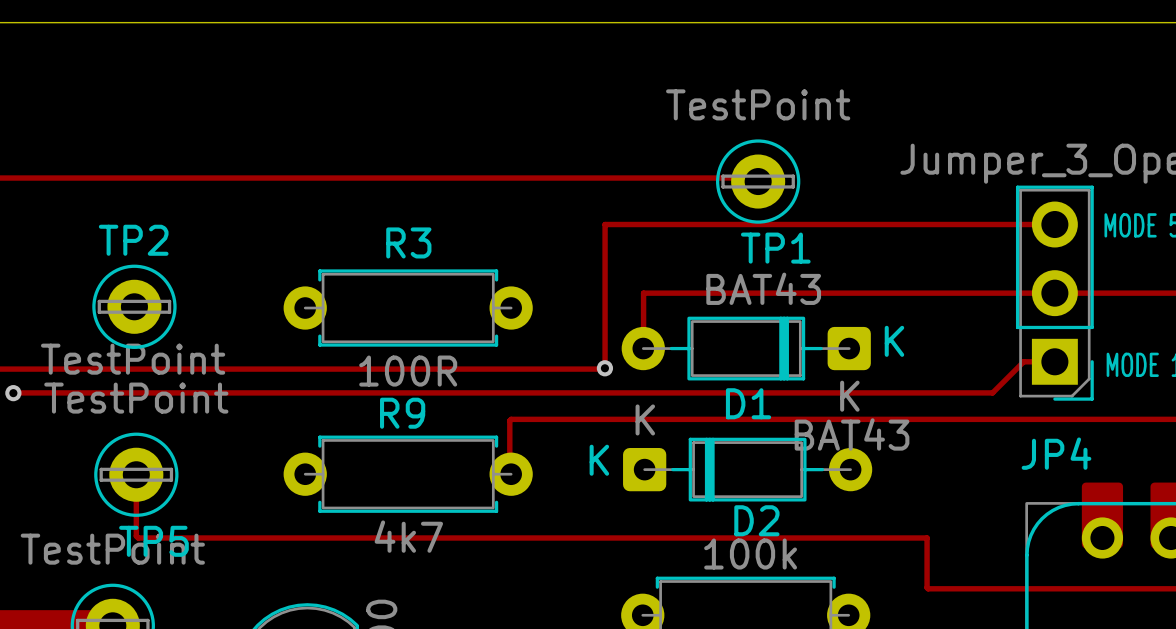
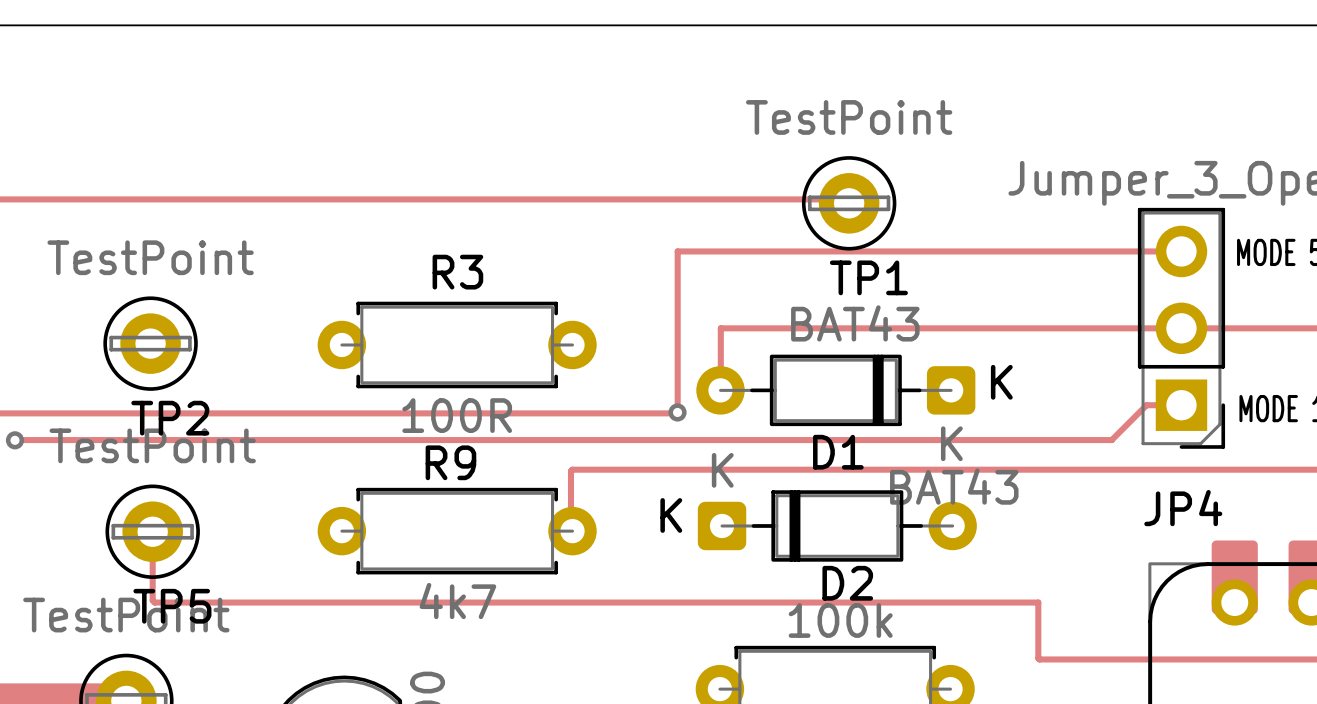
TP2 name position: TP2 (133, 240) -> TP2 (170, 418)
TP2 value position: TestPoint (133, 359) -> TestPoint (150, 257)

